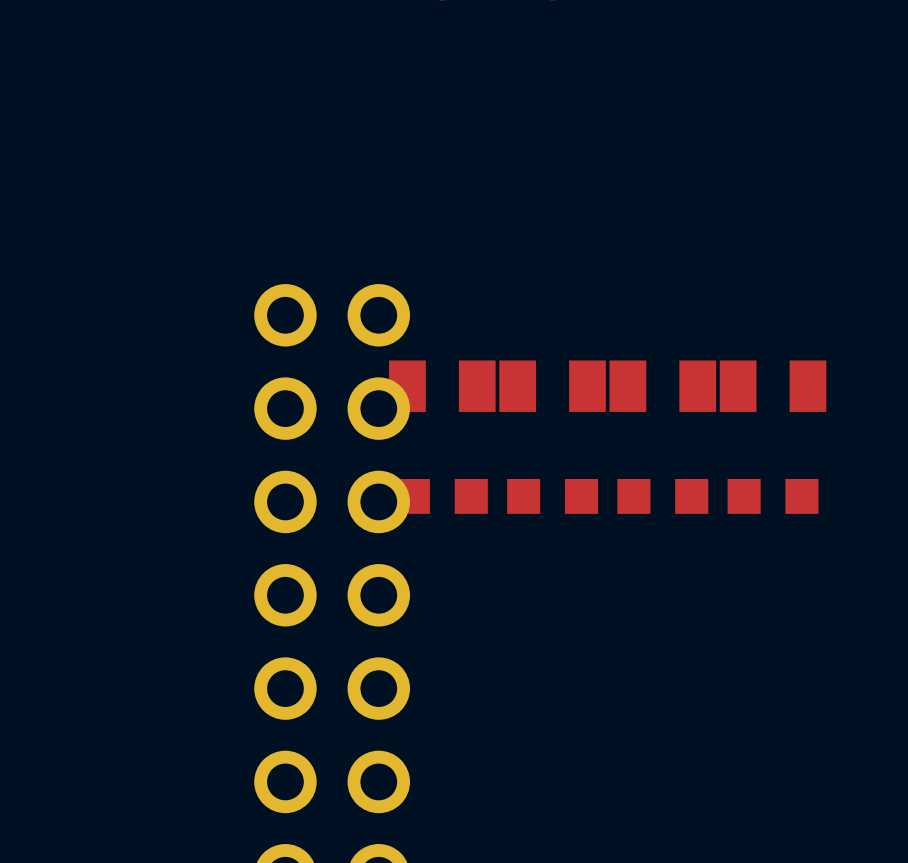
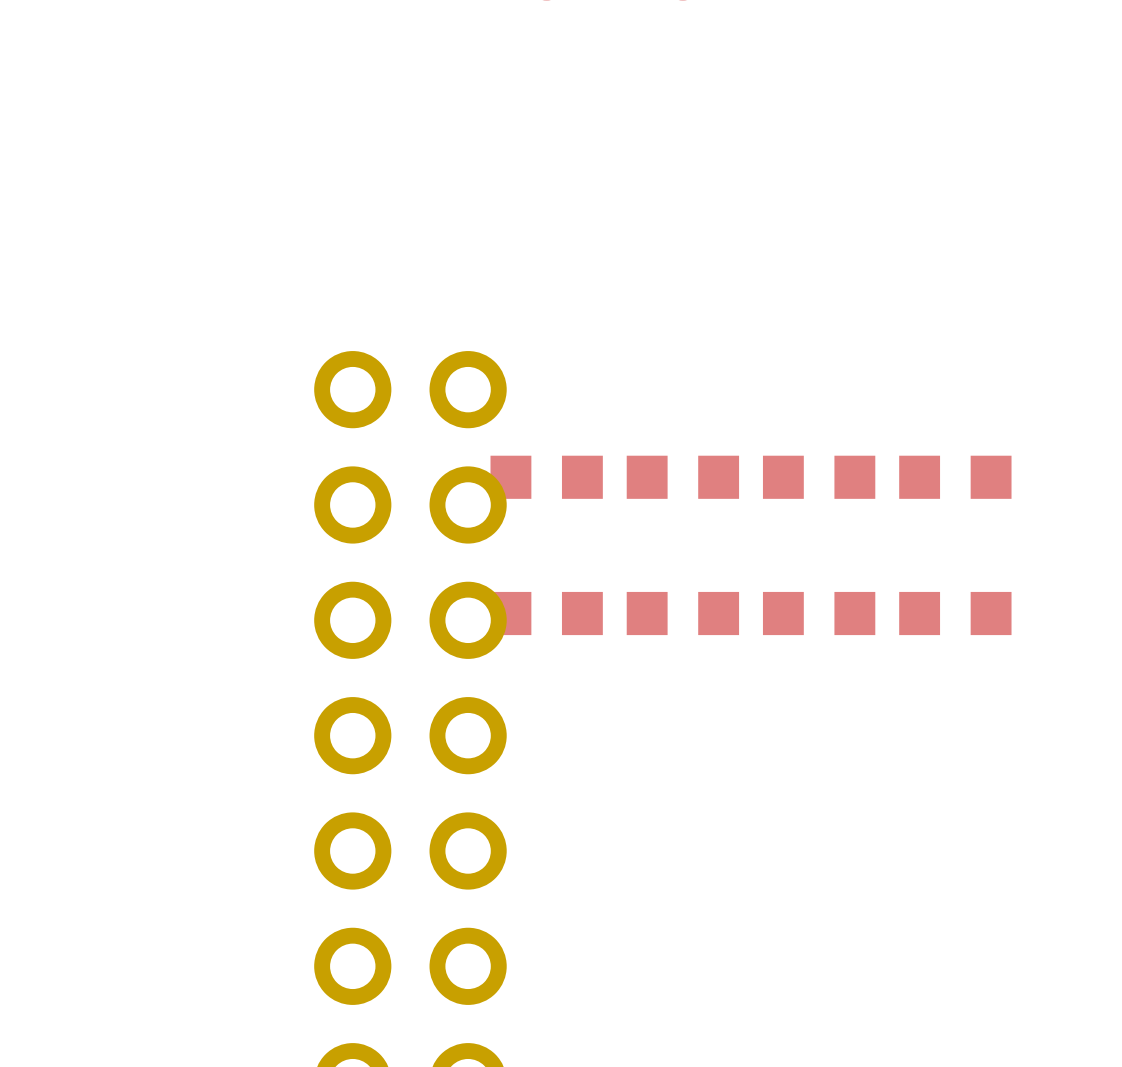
part footprint: [389, 360, 496, 412] -> [490, 455, 603, 499]
part footprint: [499, 360, 606, 412] -> [626, 455, 740, 499]
part footprint: [609, 360, 717, 412] -> [762, 455, 876, 499]
part footprint: [719, 360, 827, 412] -> [899, 455, 1012, 499]

